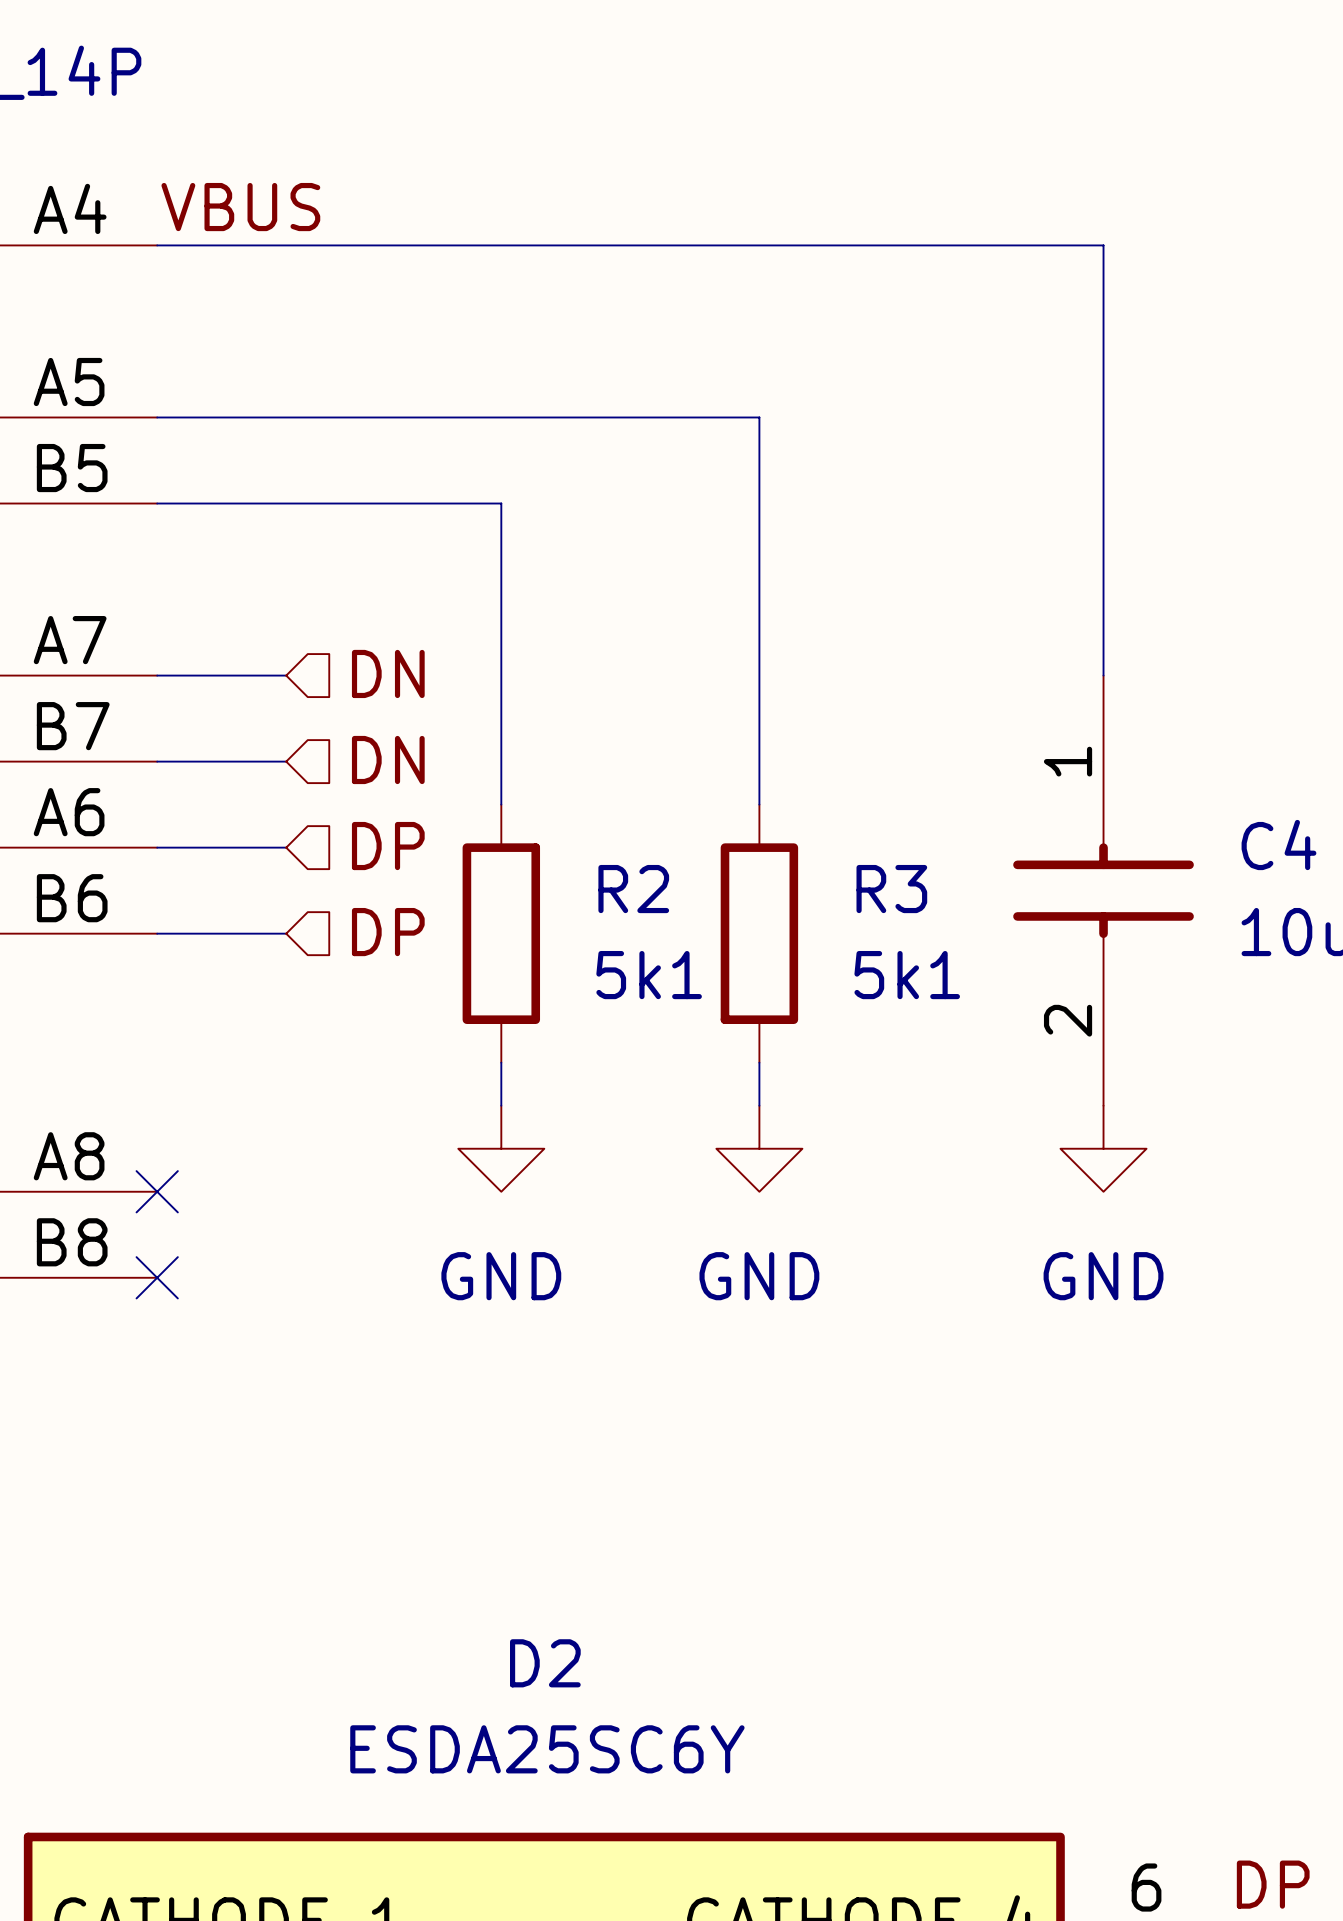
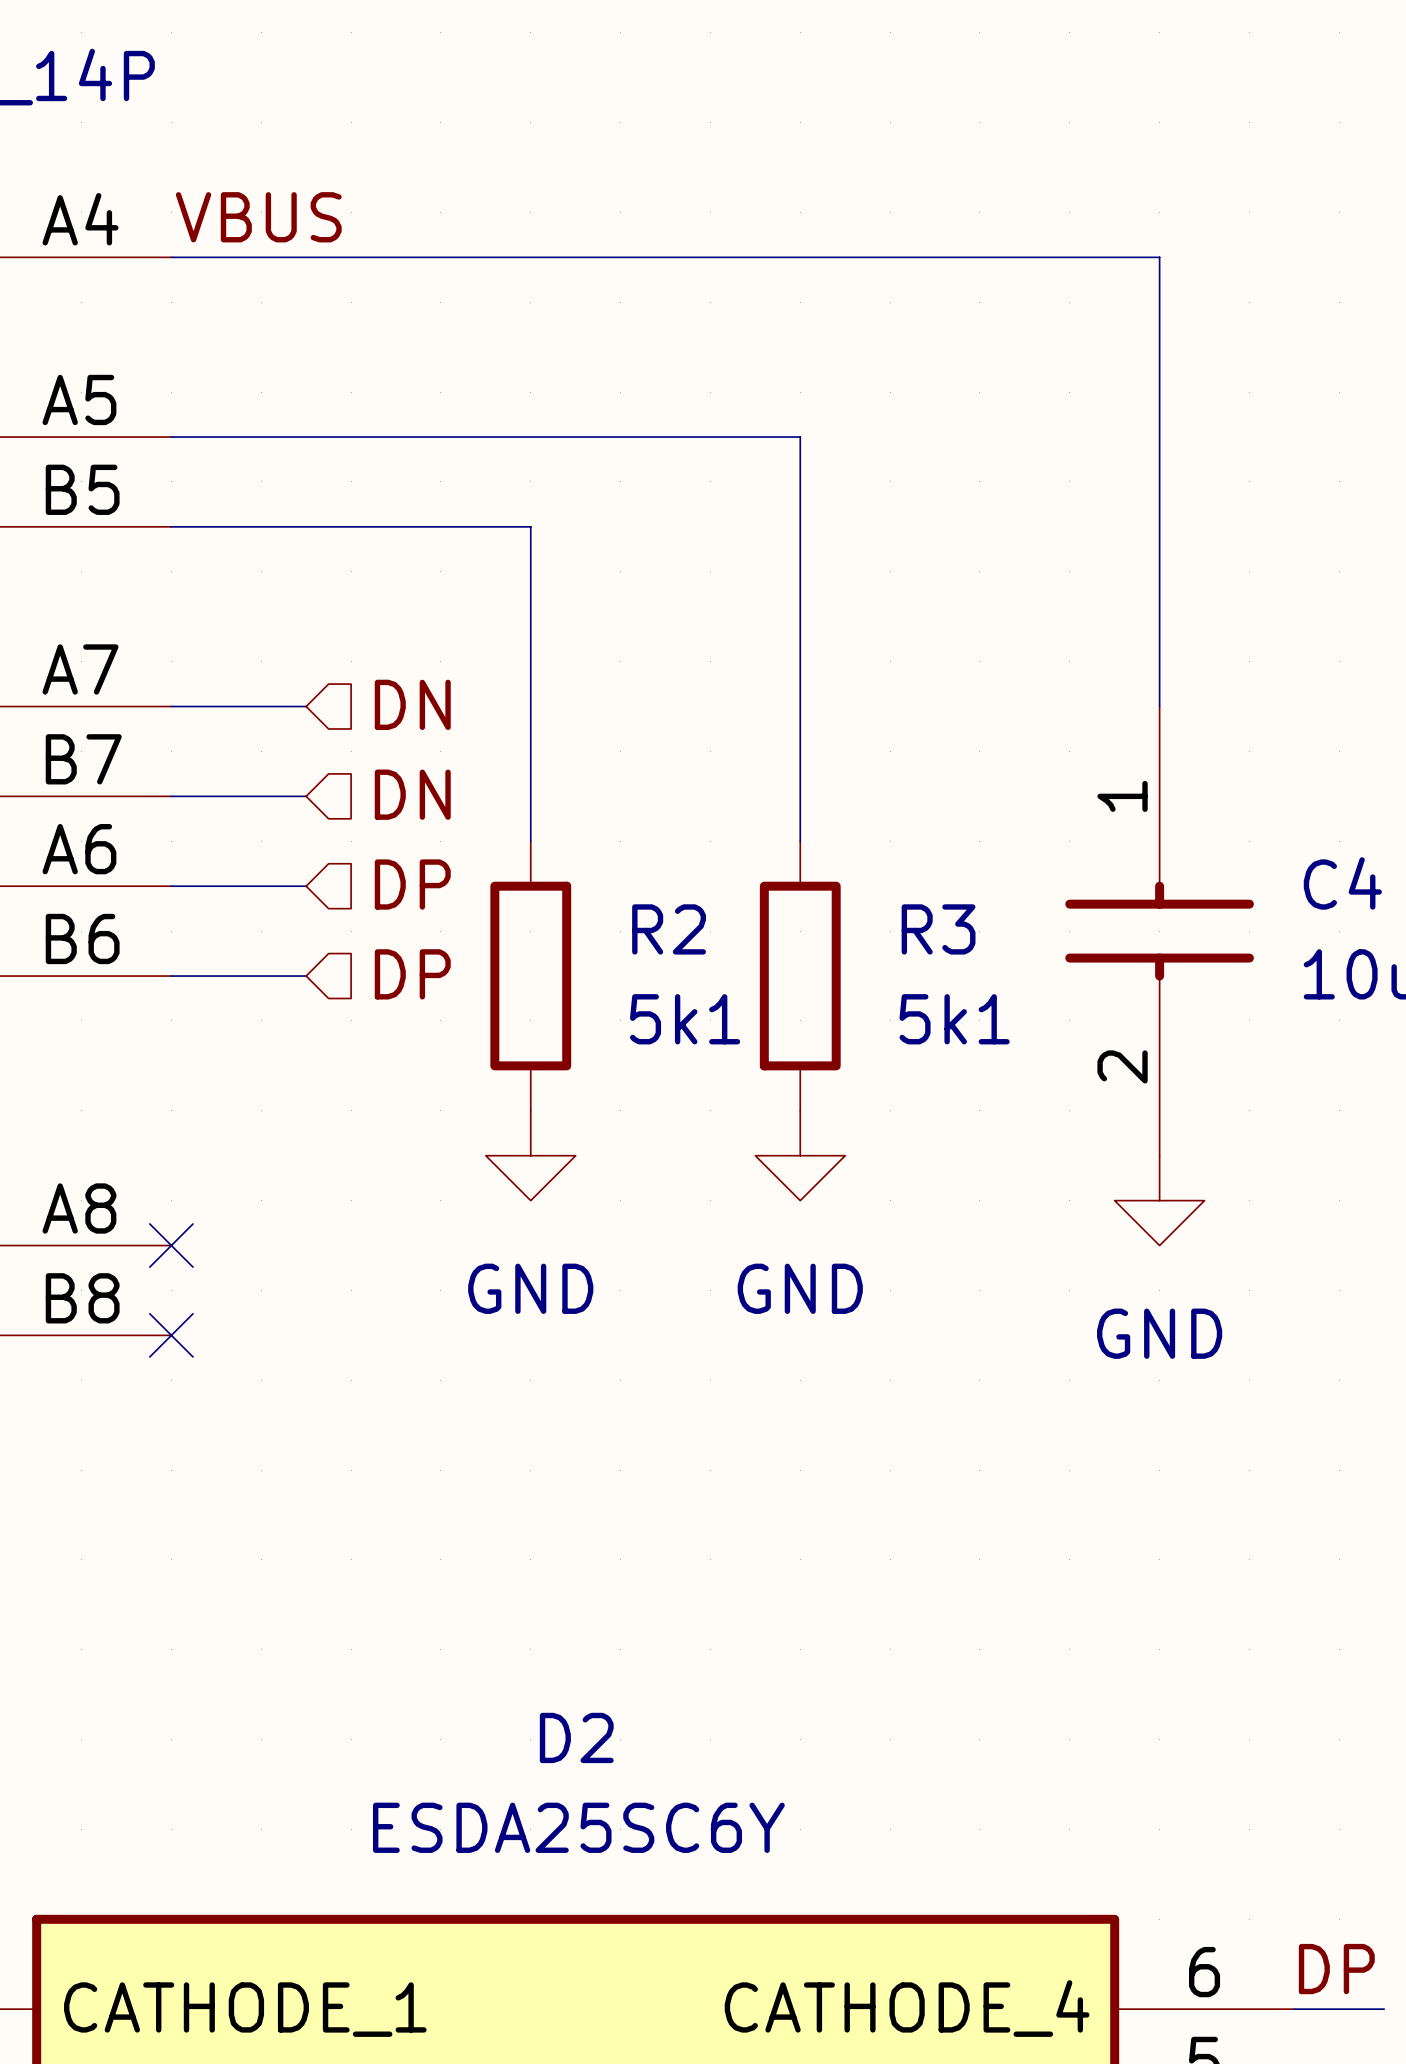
power symbol position: GND (501, 1148) -> GND (530, 1155)
power symbol position: GND (759, 1148) -> GND (800, 1155)

